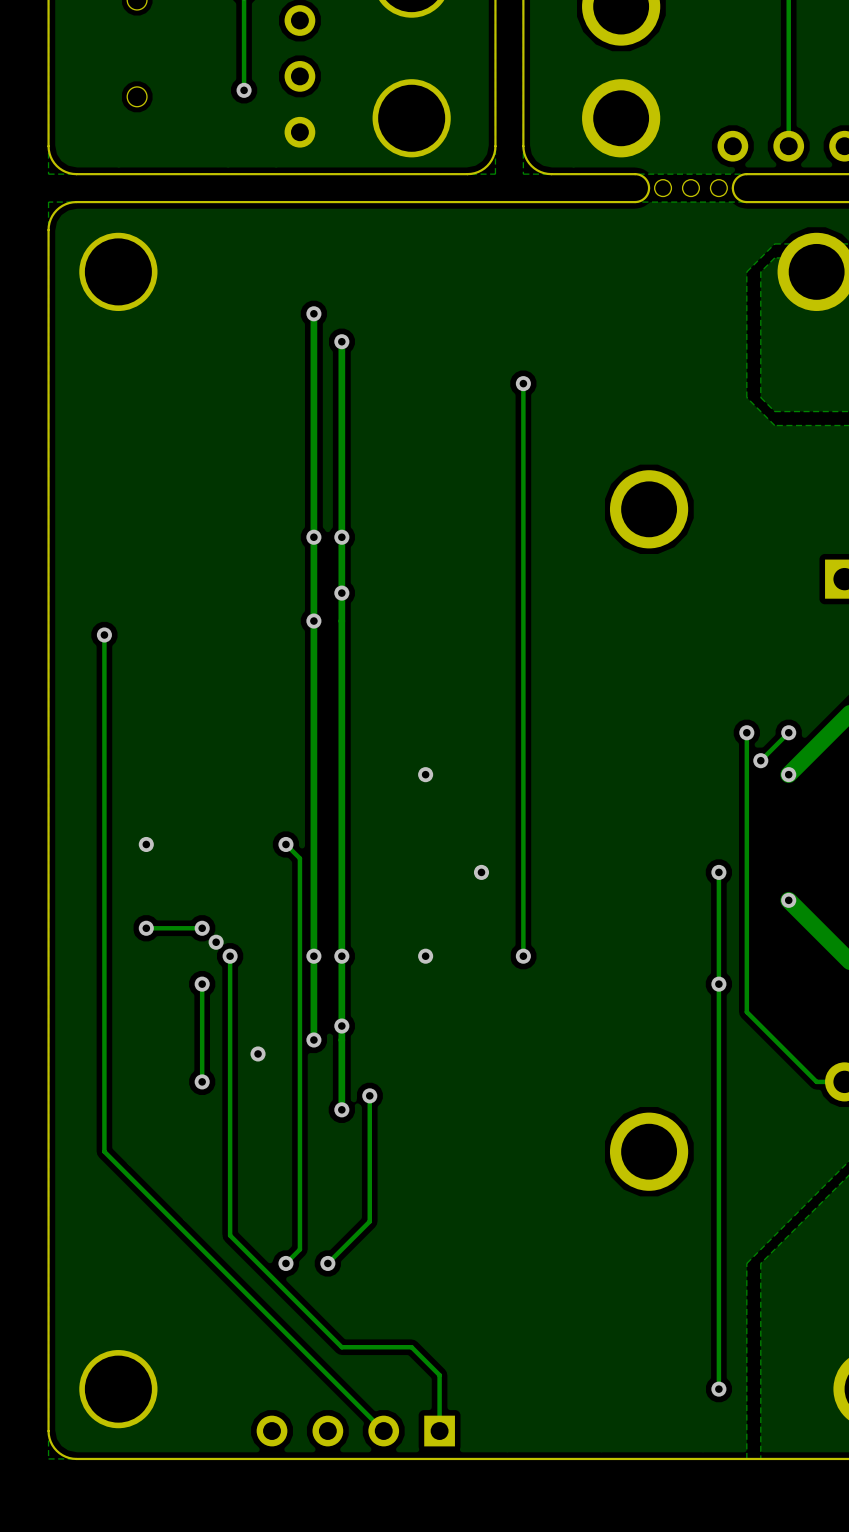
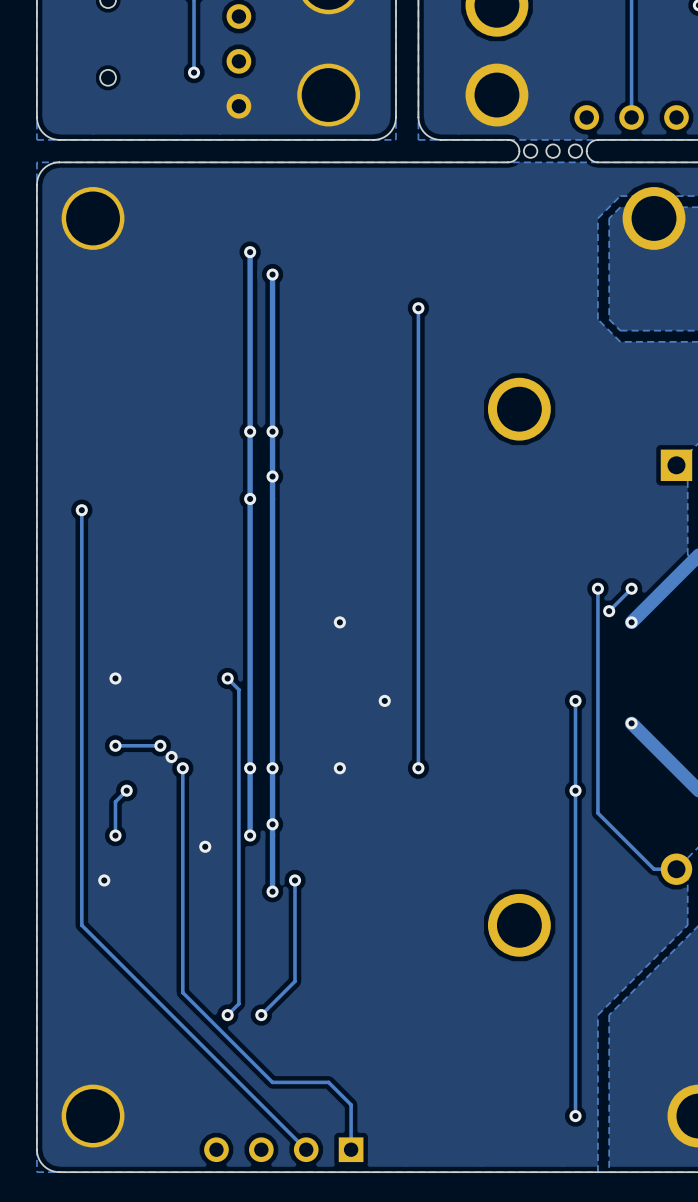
track: none -> (126, 790) (115, 801) (115, 835)
via: none -> (126, 790)
track: (202, 984) (202, 1081) -> none
via: (202, 984) -> none
via: none -> (115, 835)
via: (202, 1081) -> none
via: none -> (104, 880)

